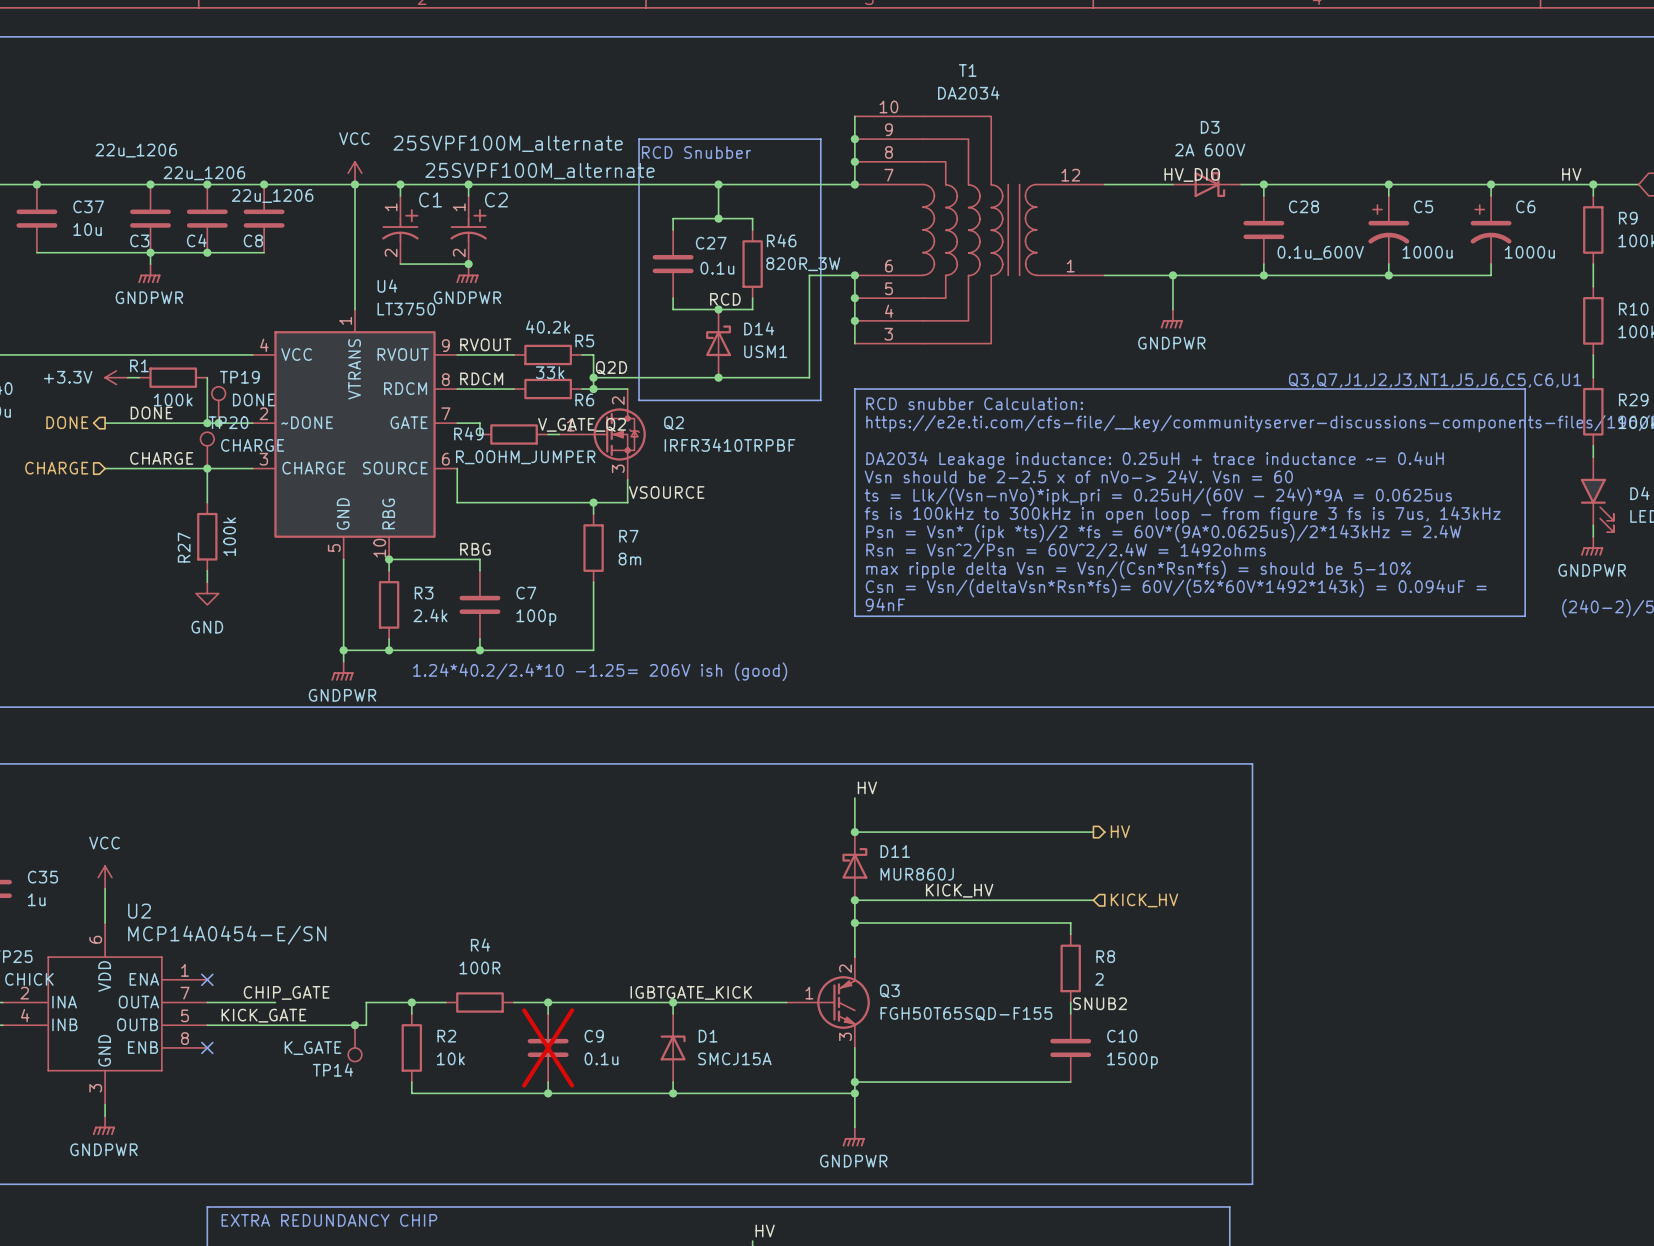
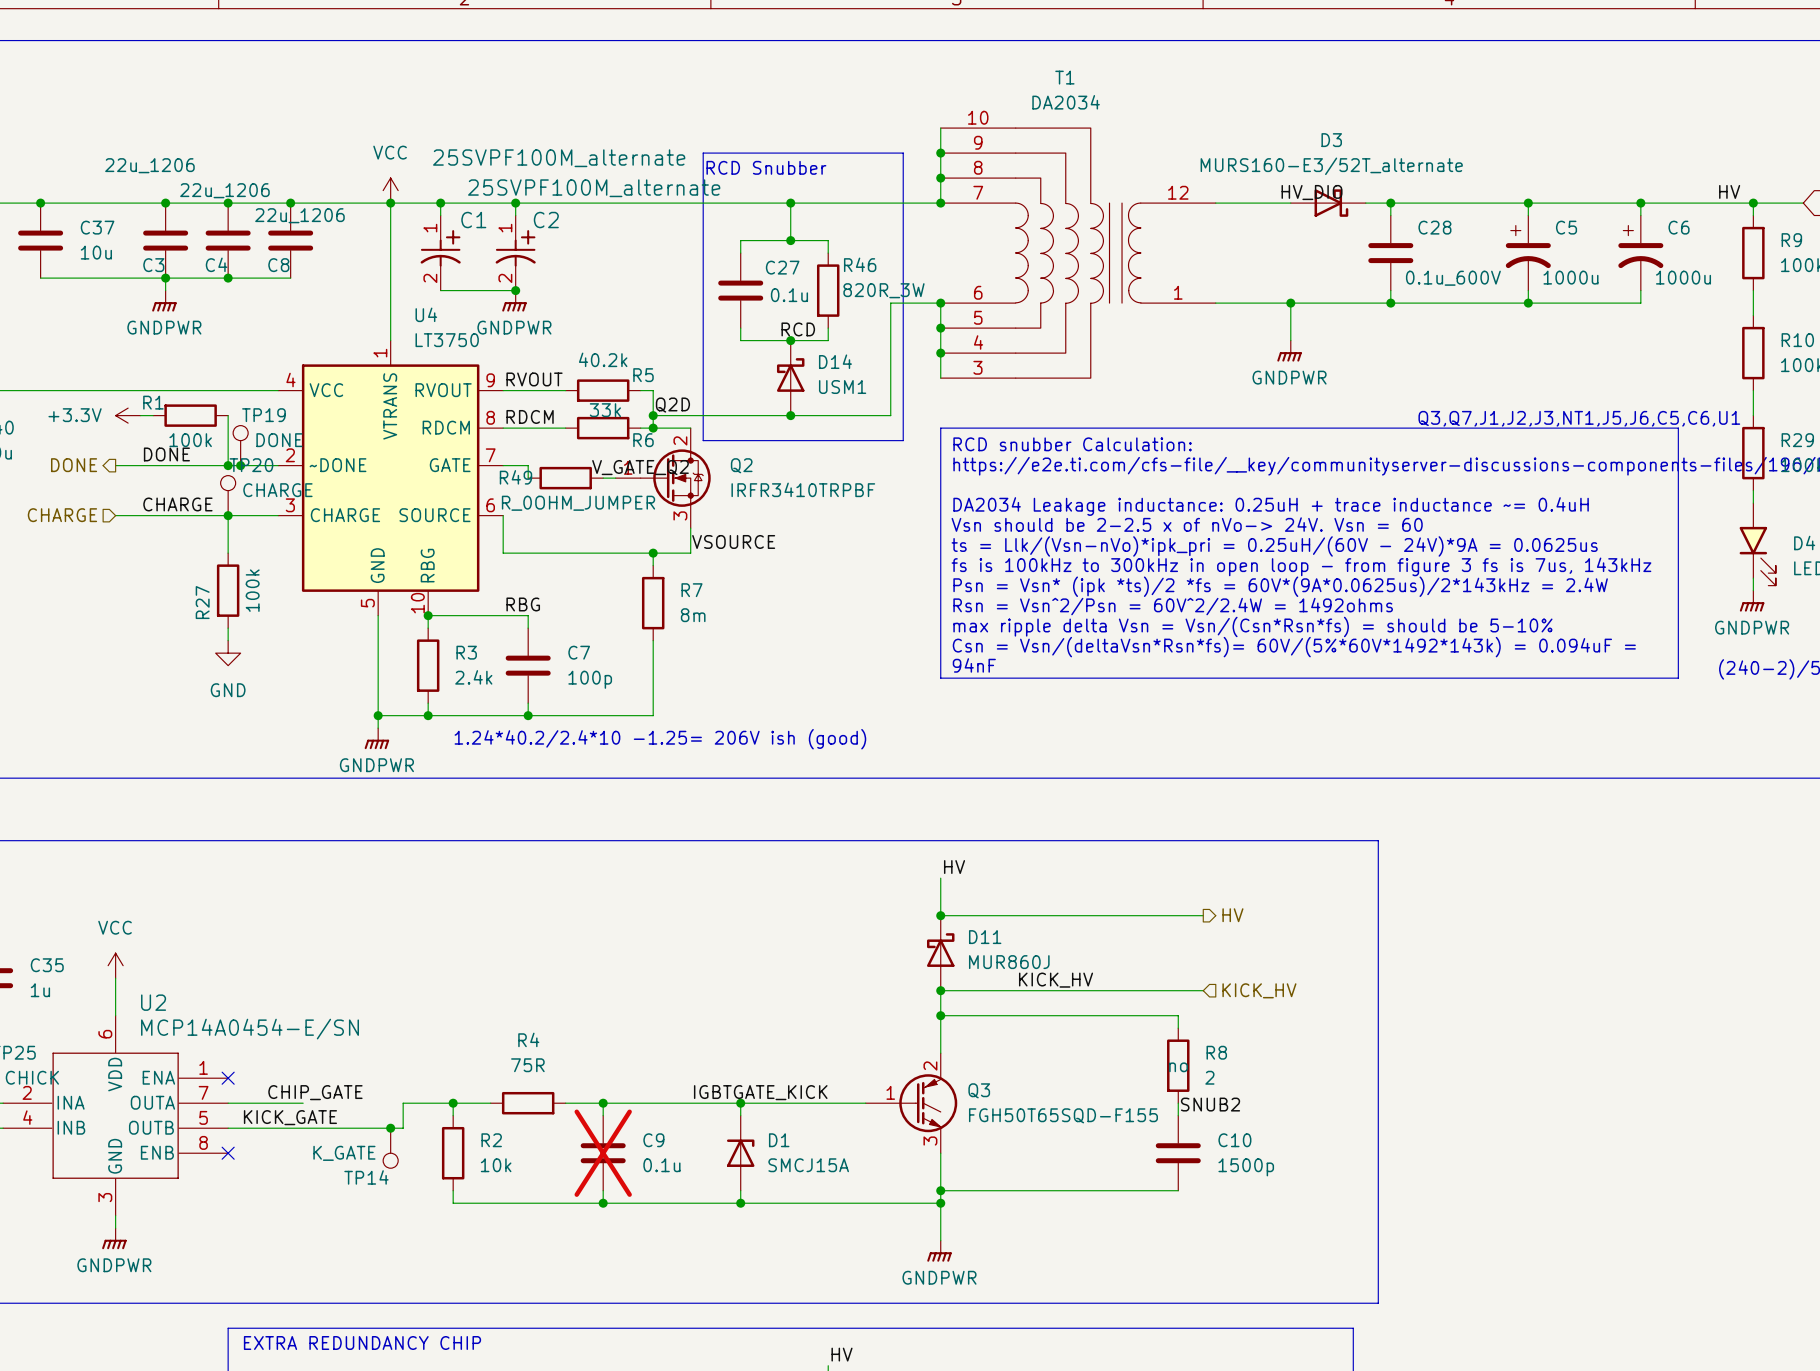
D3 value: 2A 600V (1210, 150) -> MURS160-E3/52T_alternate (1331, 166)
R4 value: 100R (479, 968) -> 75R (527, 1065)
R8 text: none -> no (1178, 1067)

